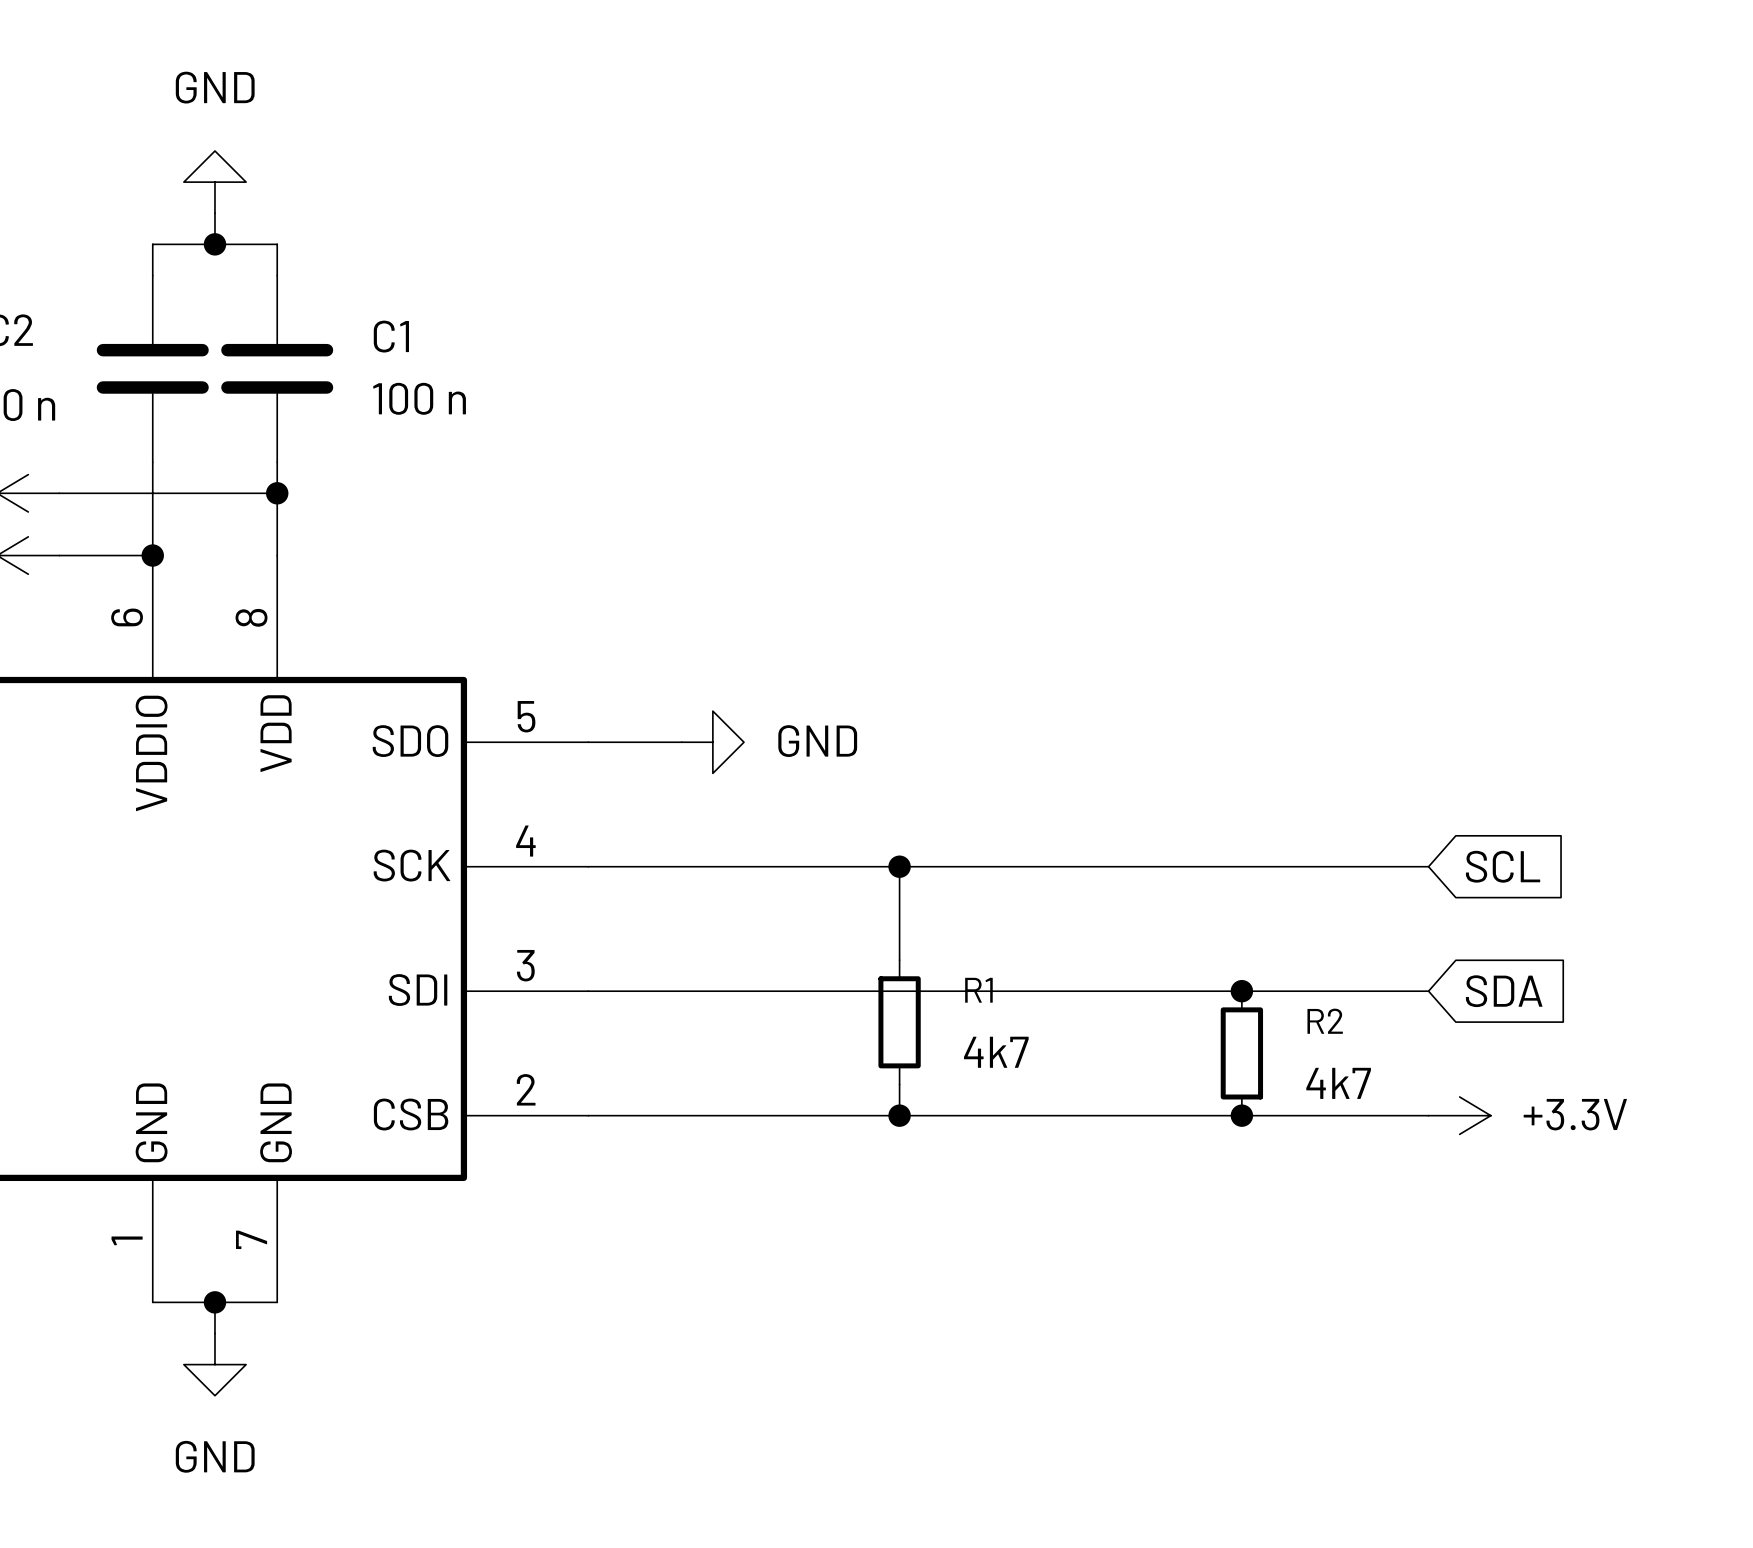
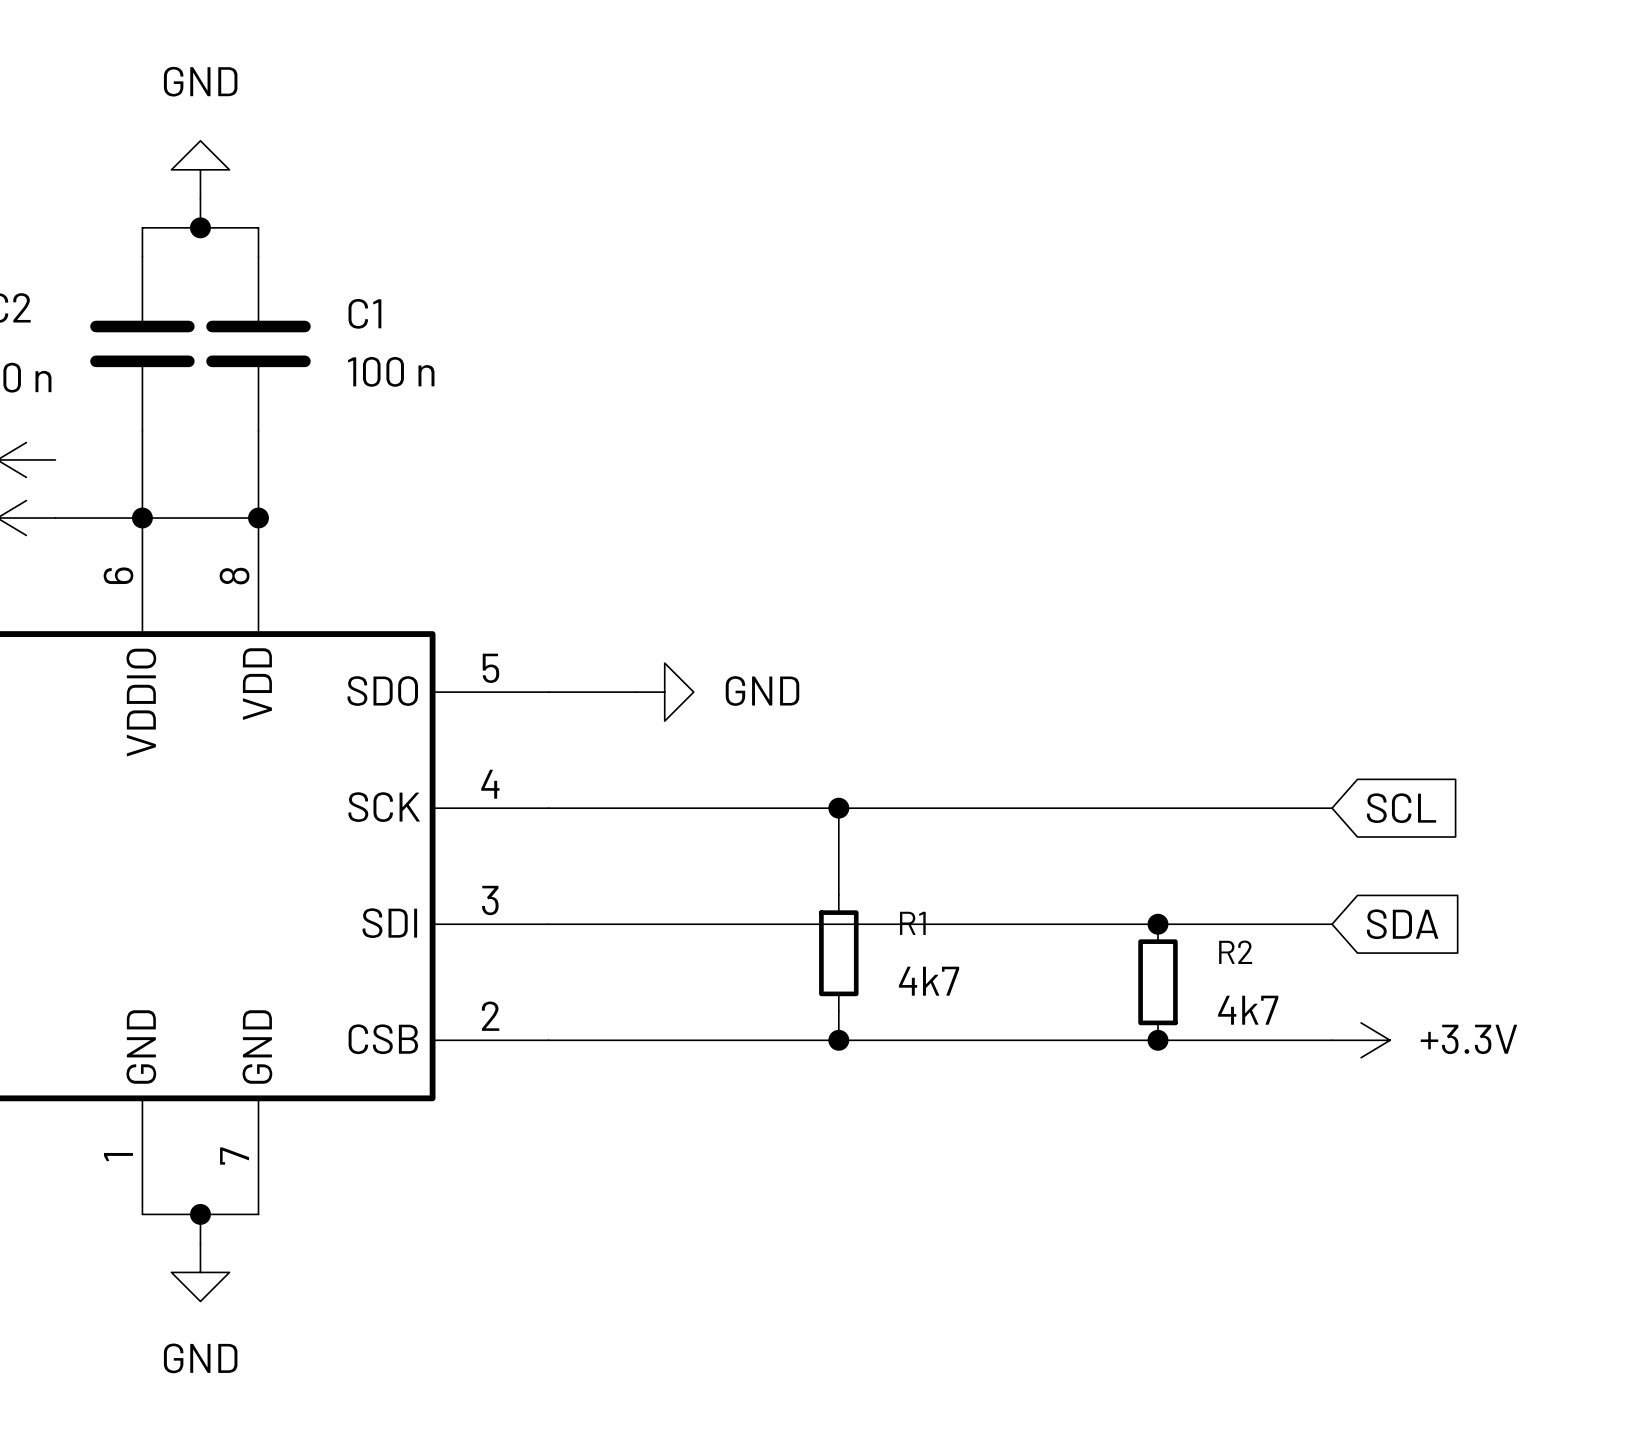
wire: (59, 493) (277, 493) -> none
junction position: (277, 493) -> (258, 518)
wire: none -> (142, 518) (258, 518)

